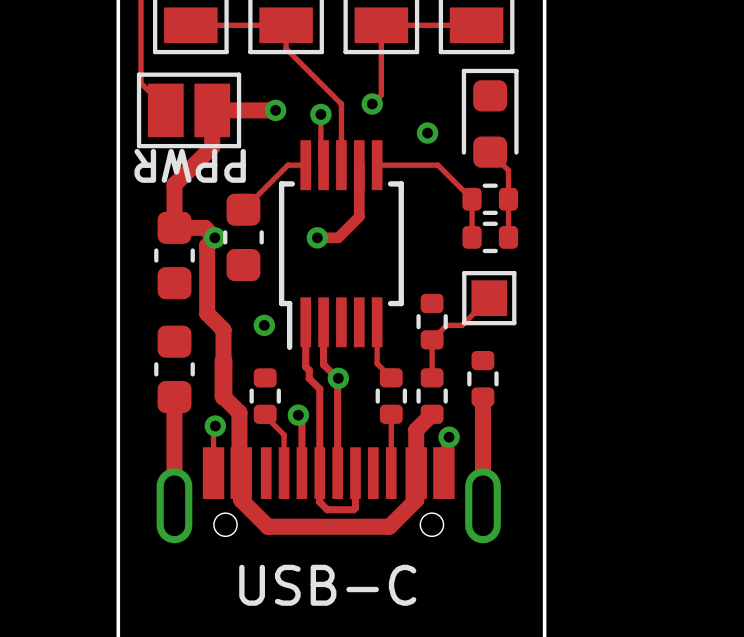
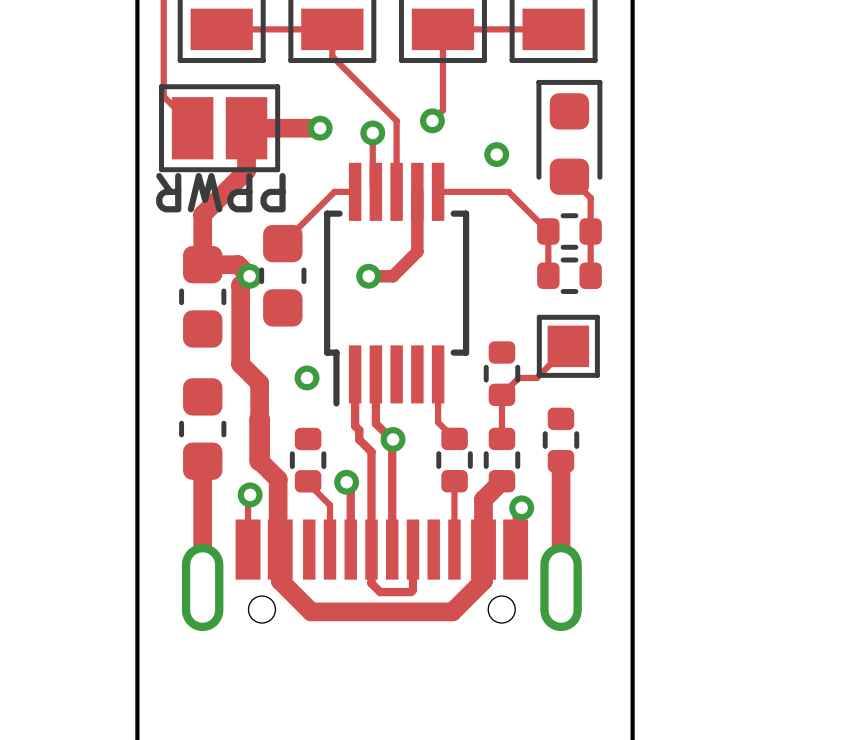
text: USB-C (327, 585) -> none

